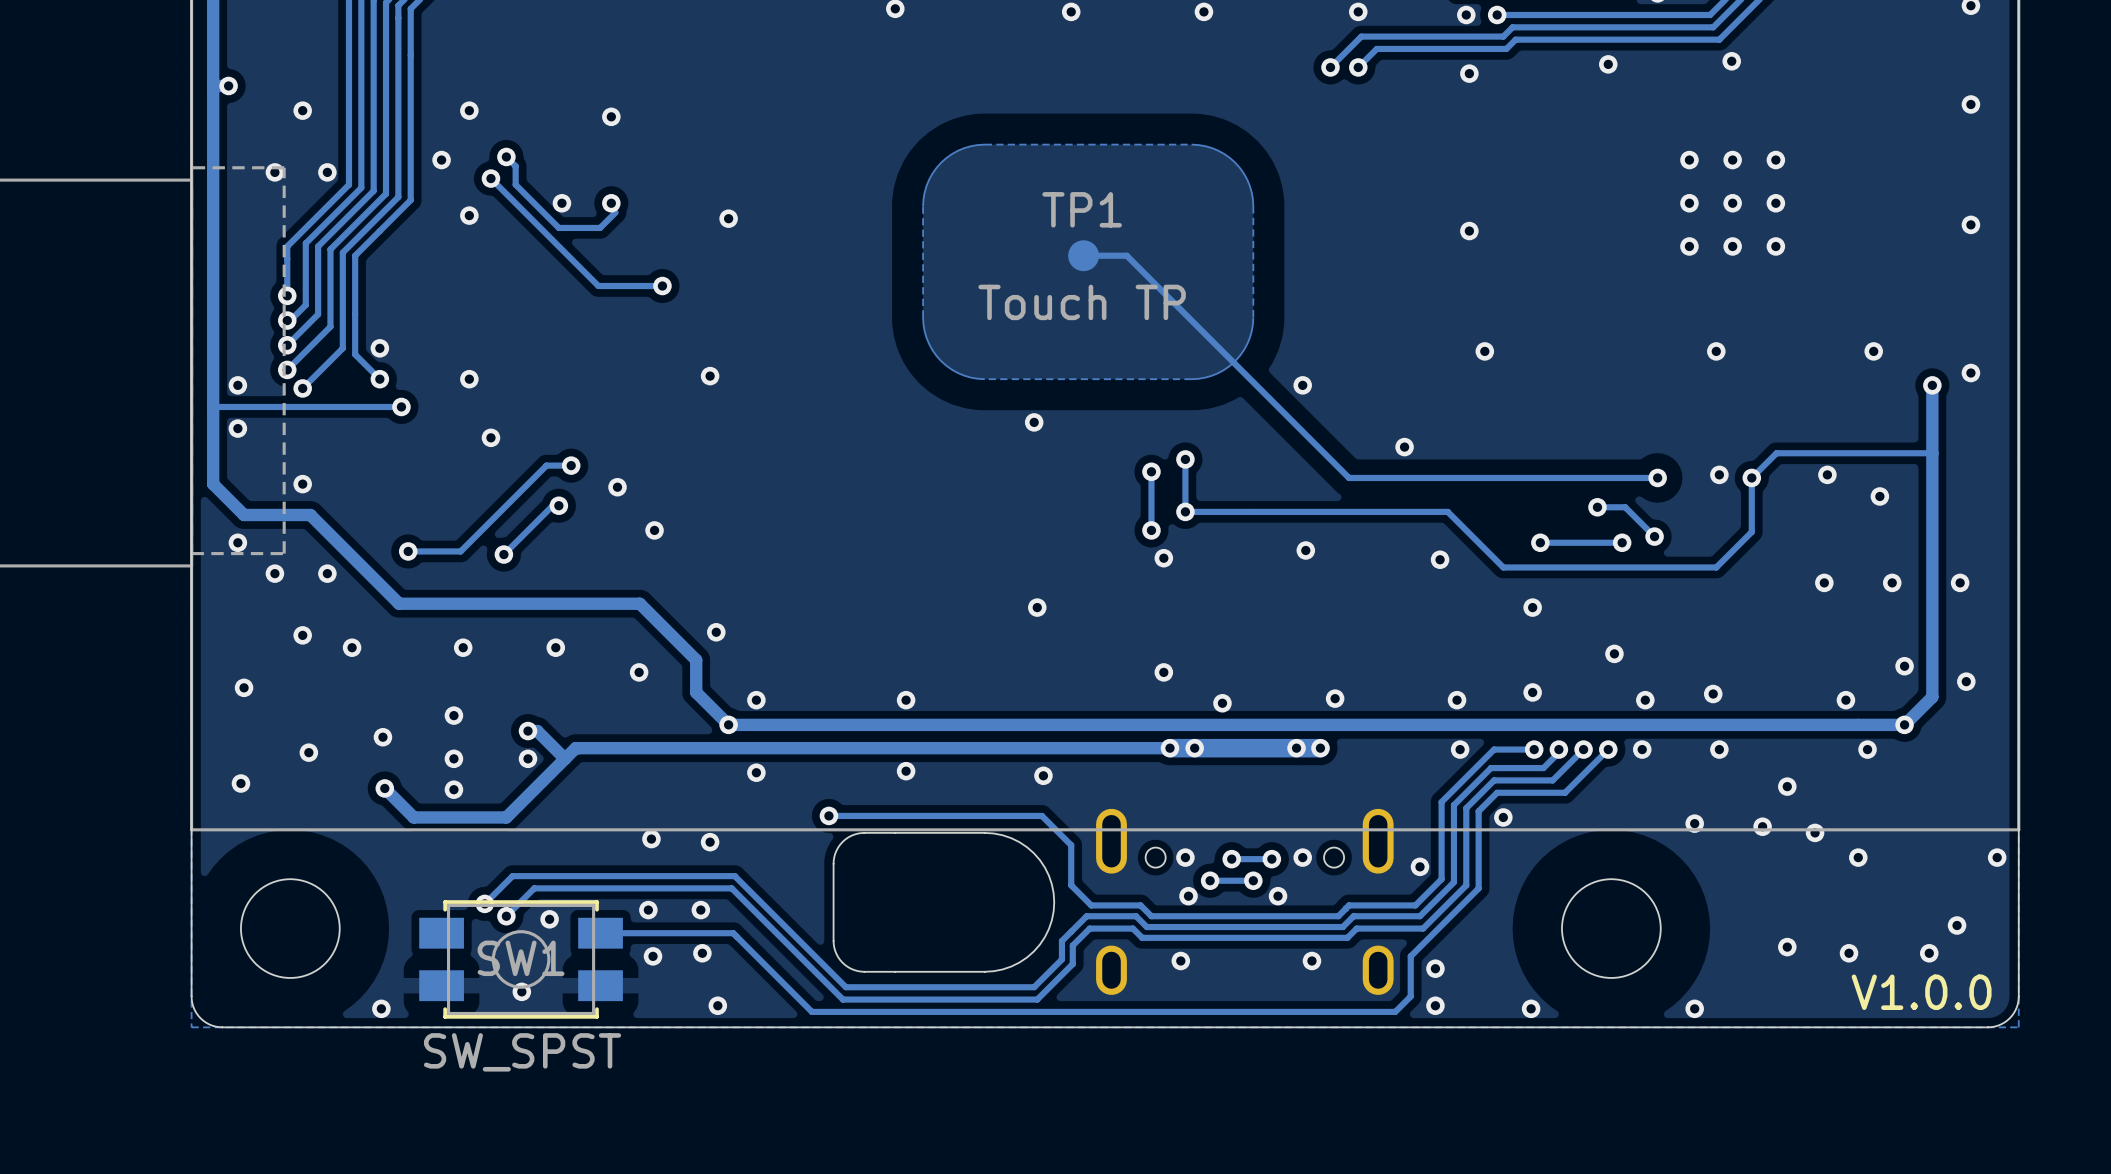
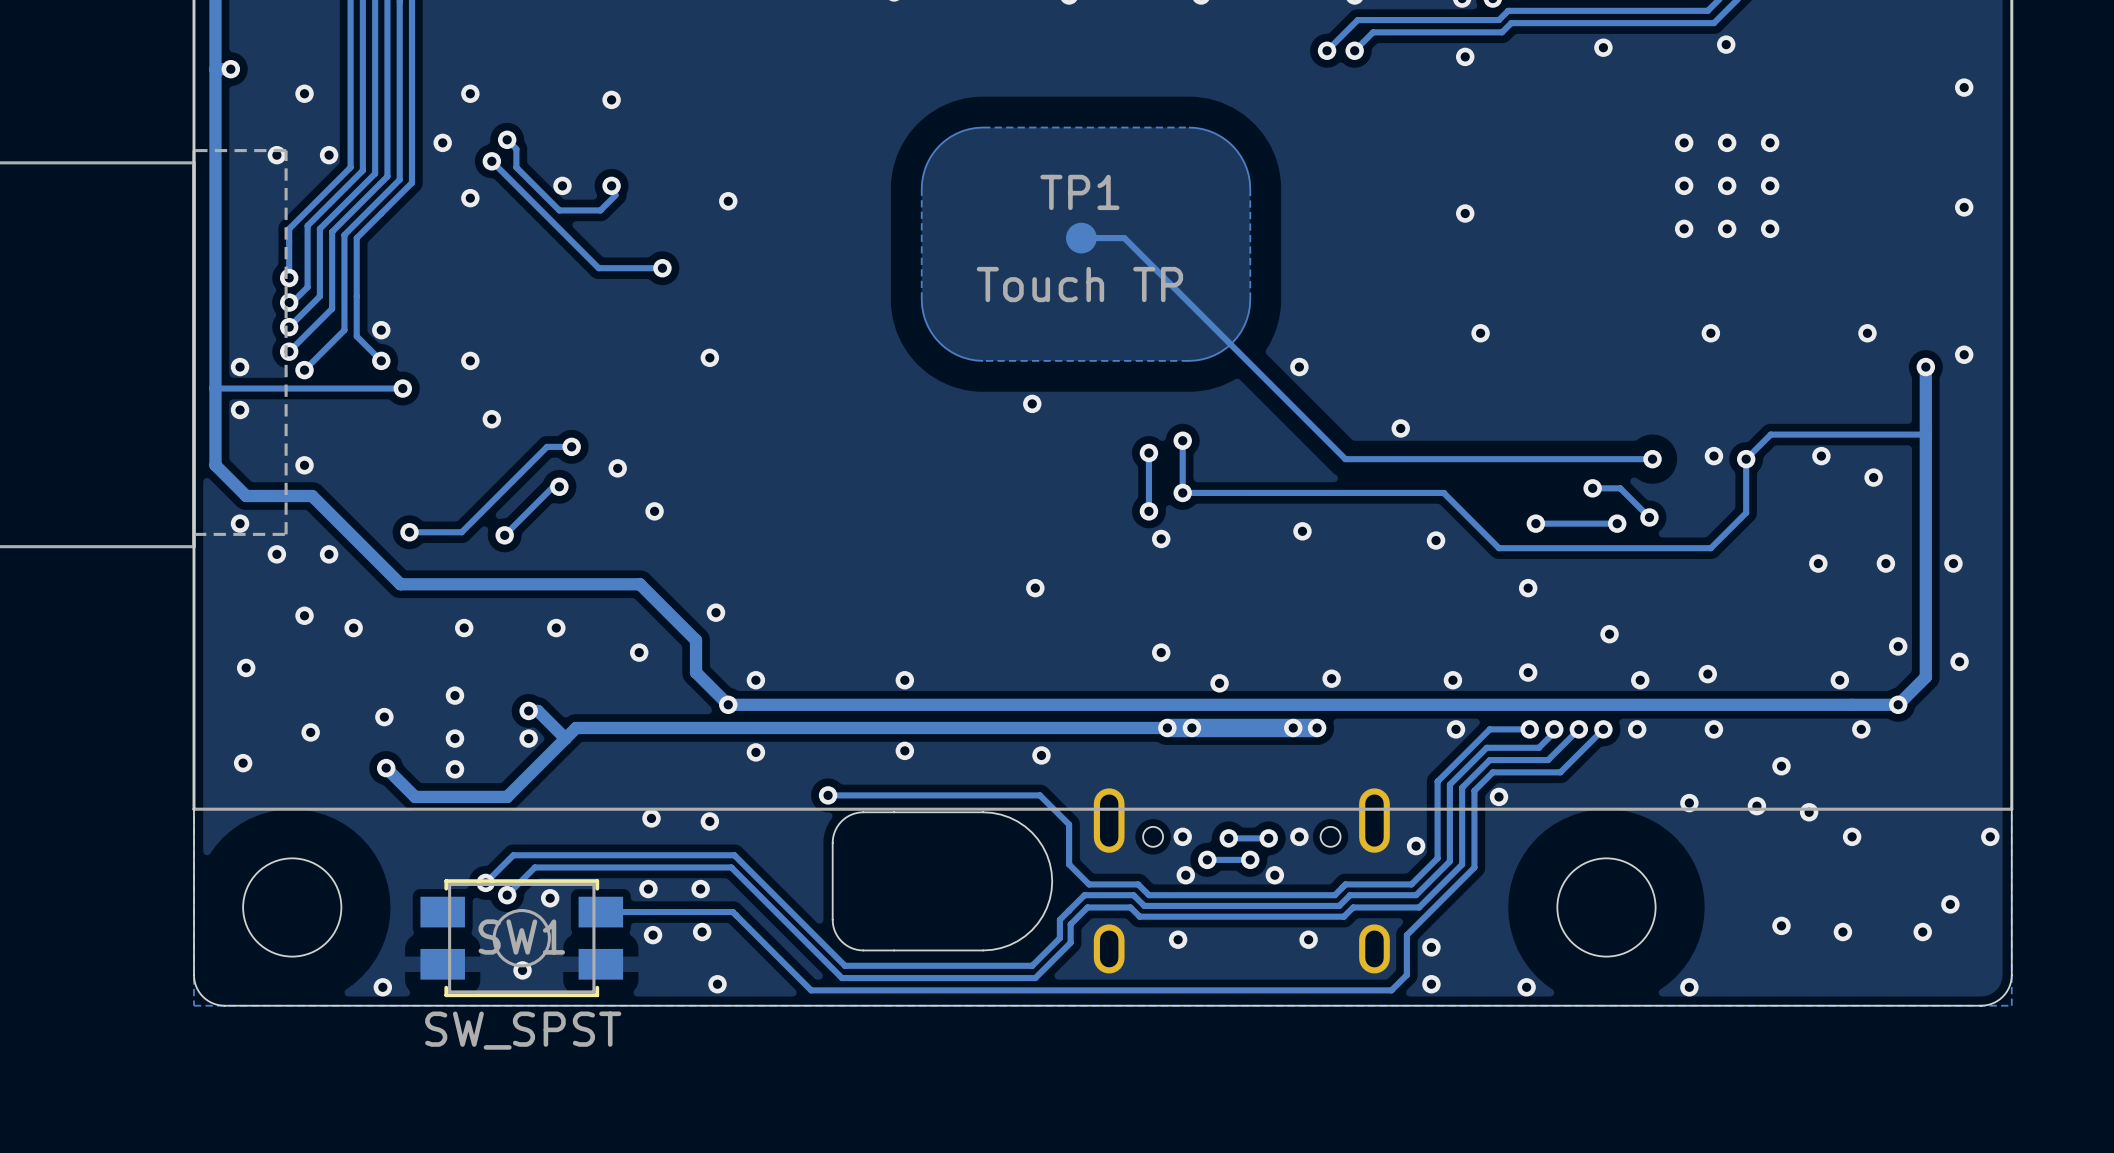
text: V1.0.0 (1921, 992) -> none

